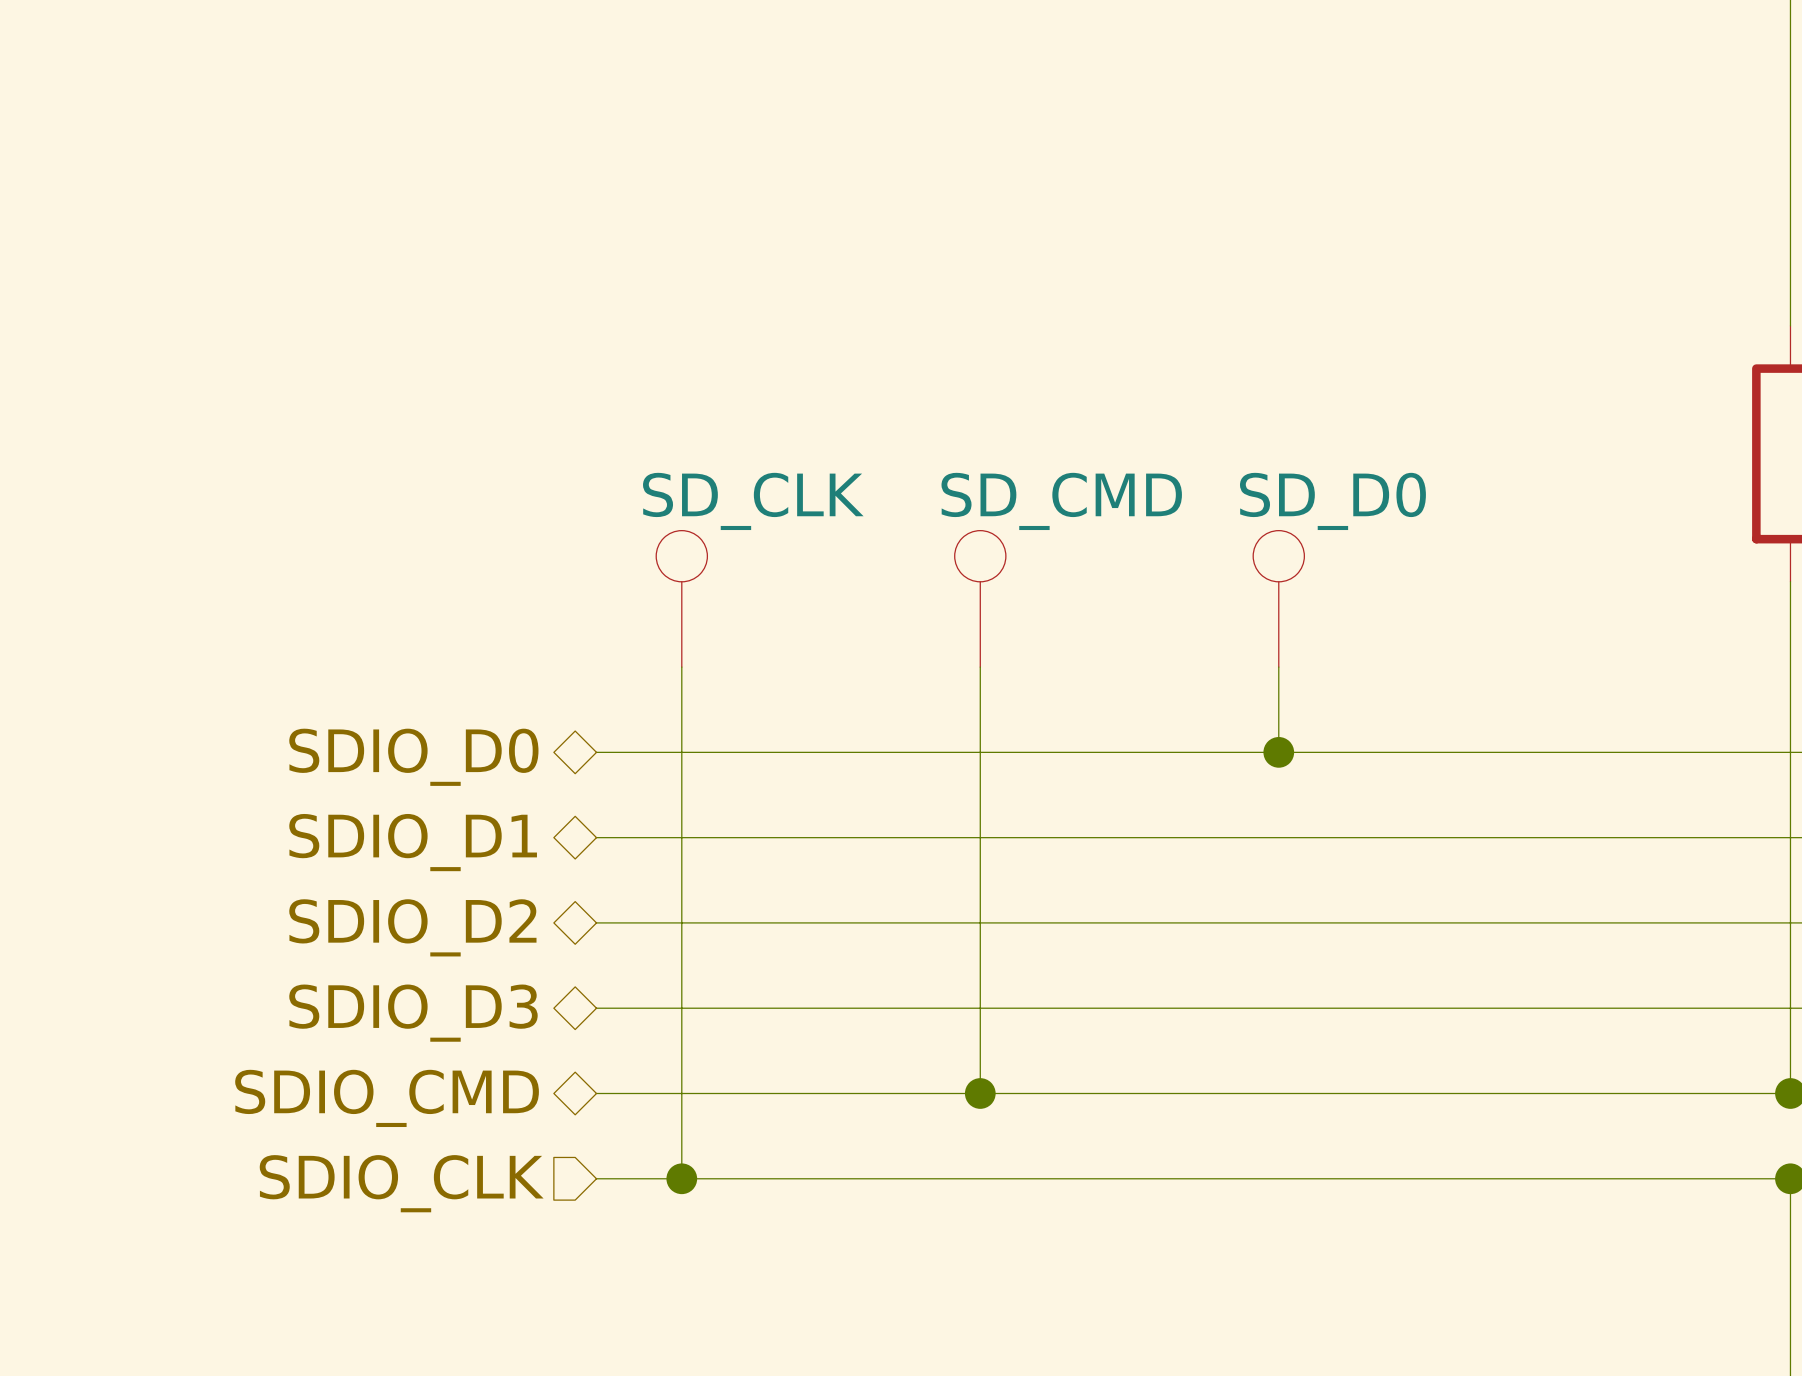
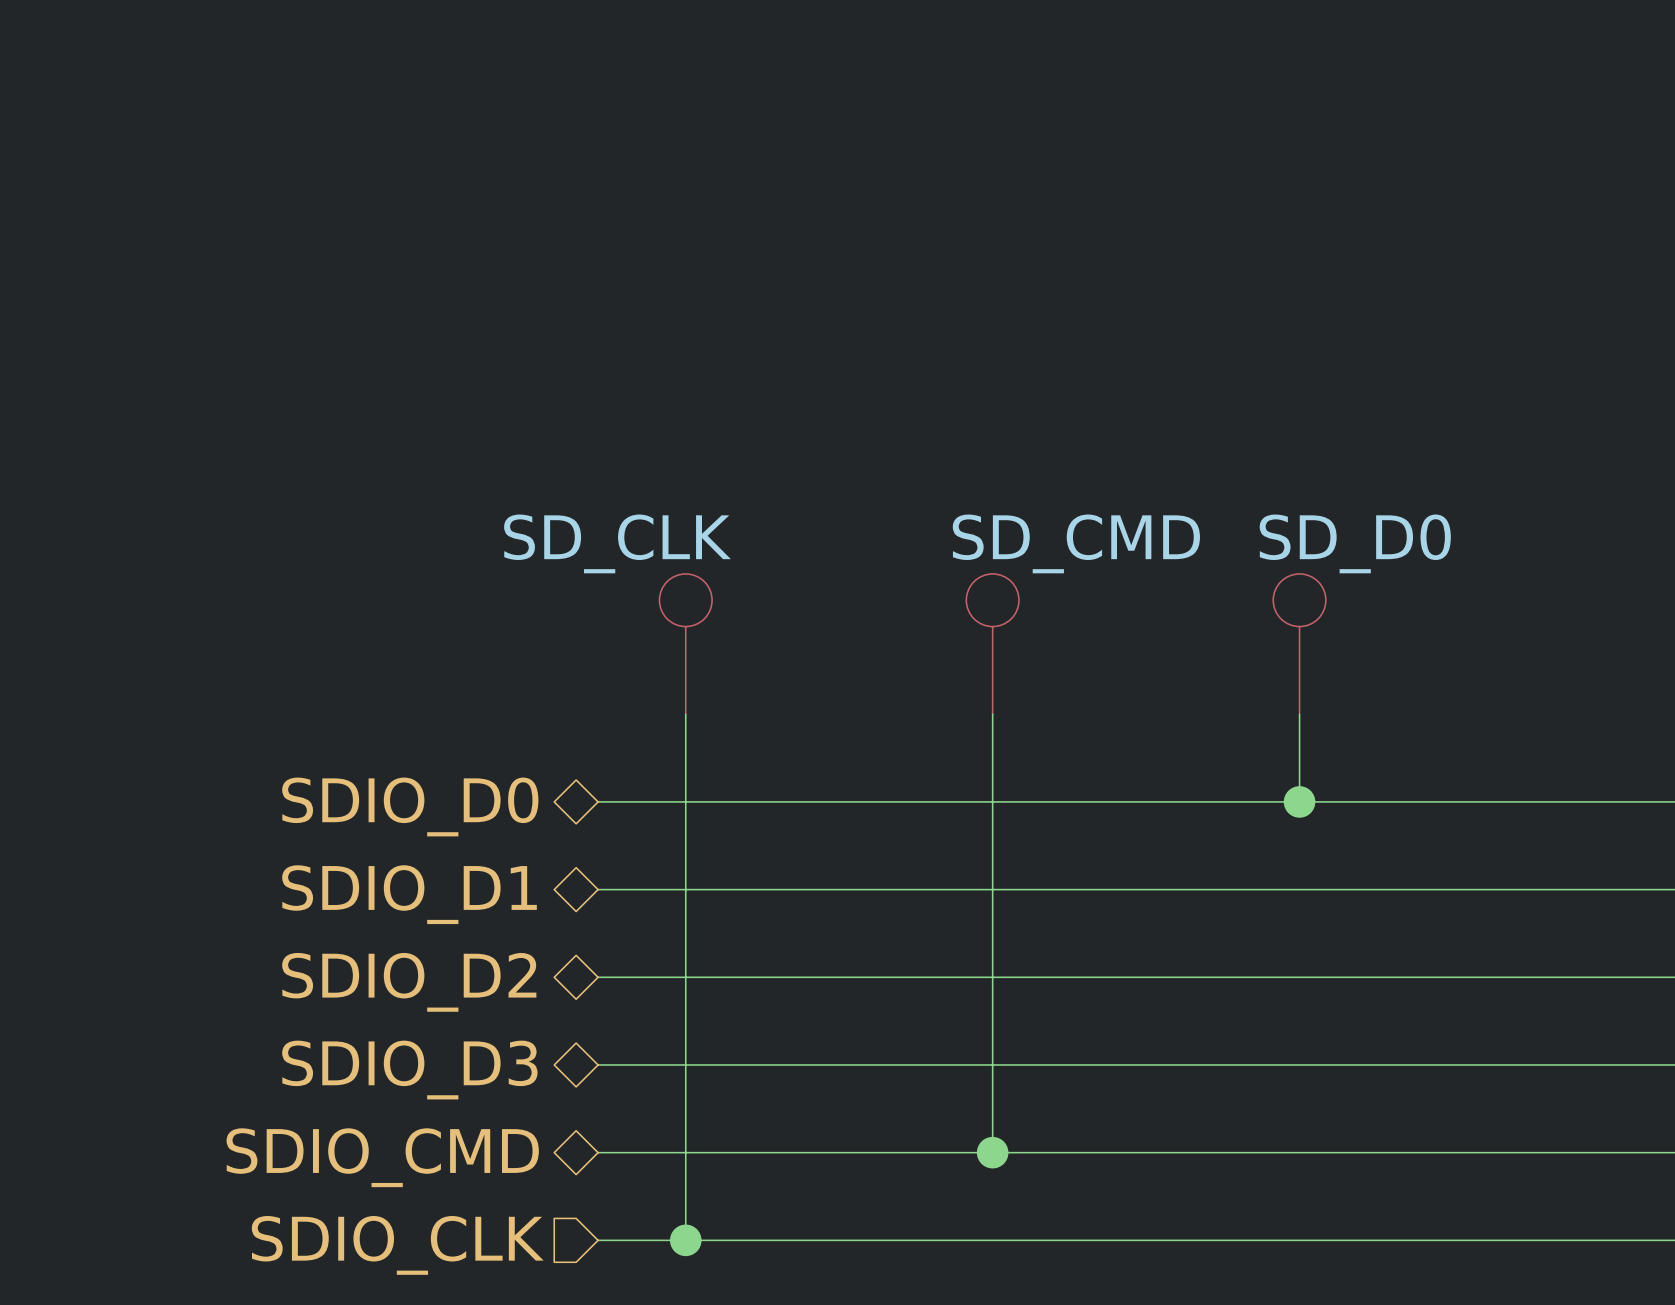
part value position: SD_CLK (753, 501) -> SD_CLK (617, 543)

